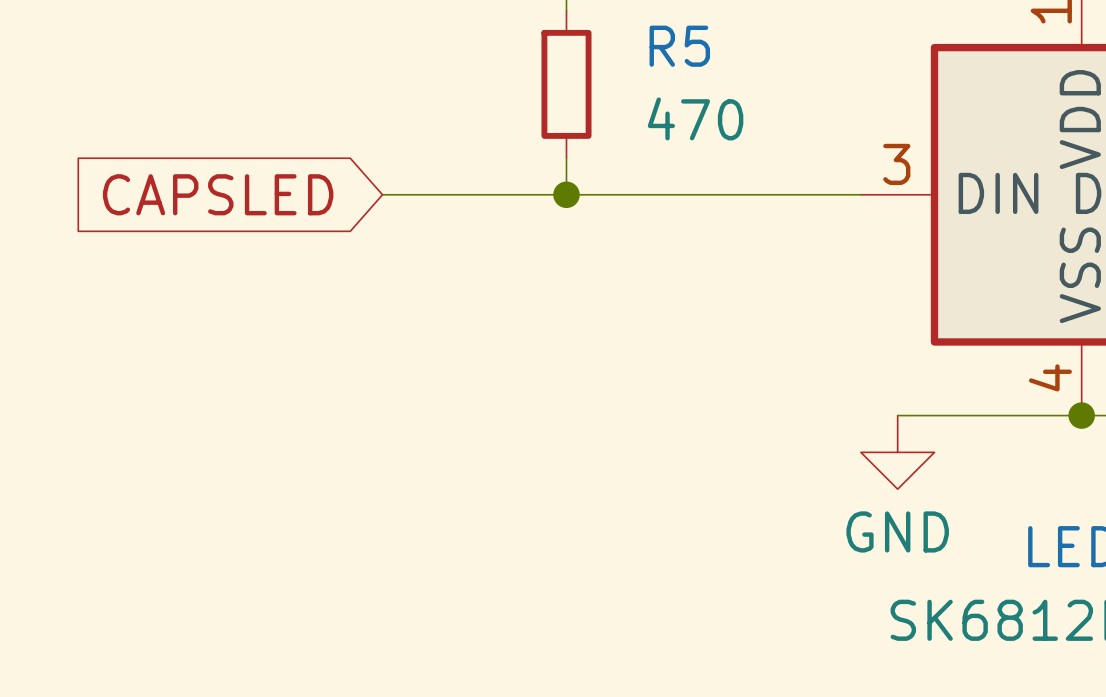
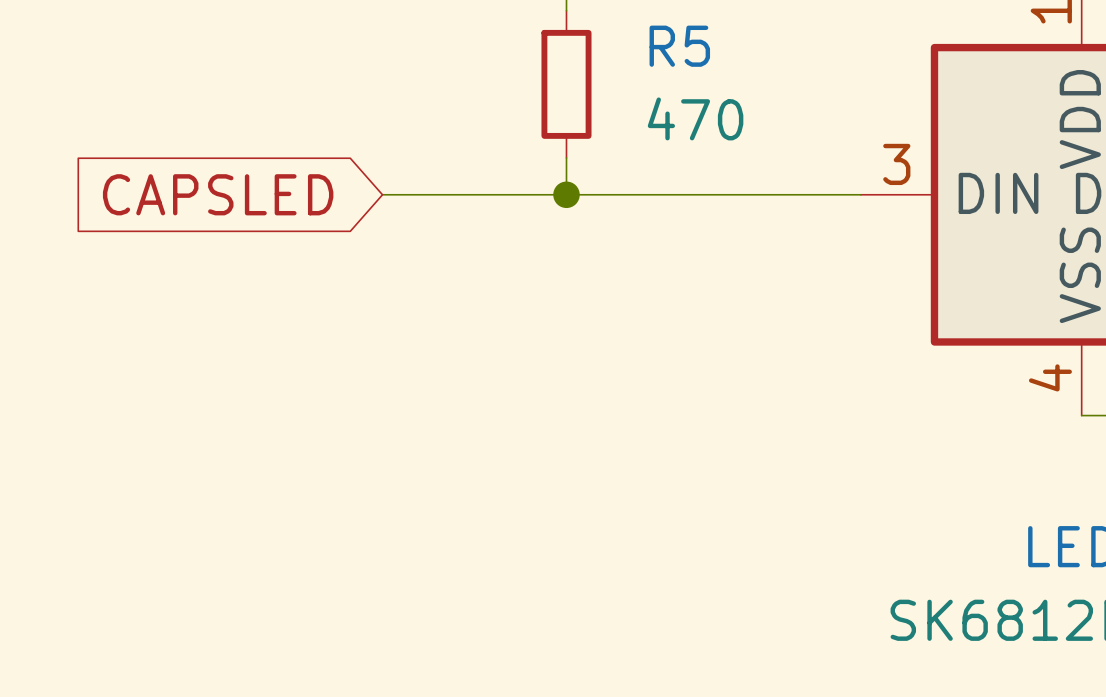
wire: (897, 415) (1081, 415) -> none
junction: (1081, 415) -> none
power symbol: GND (897, 452) -> none

